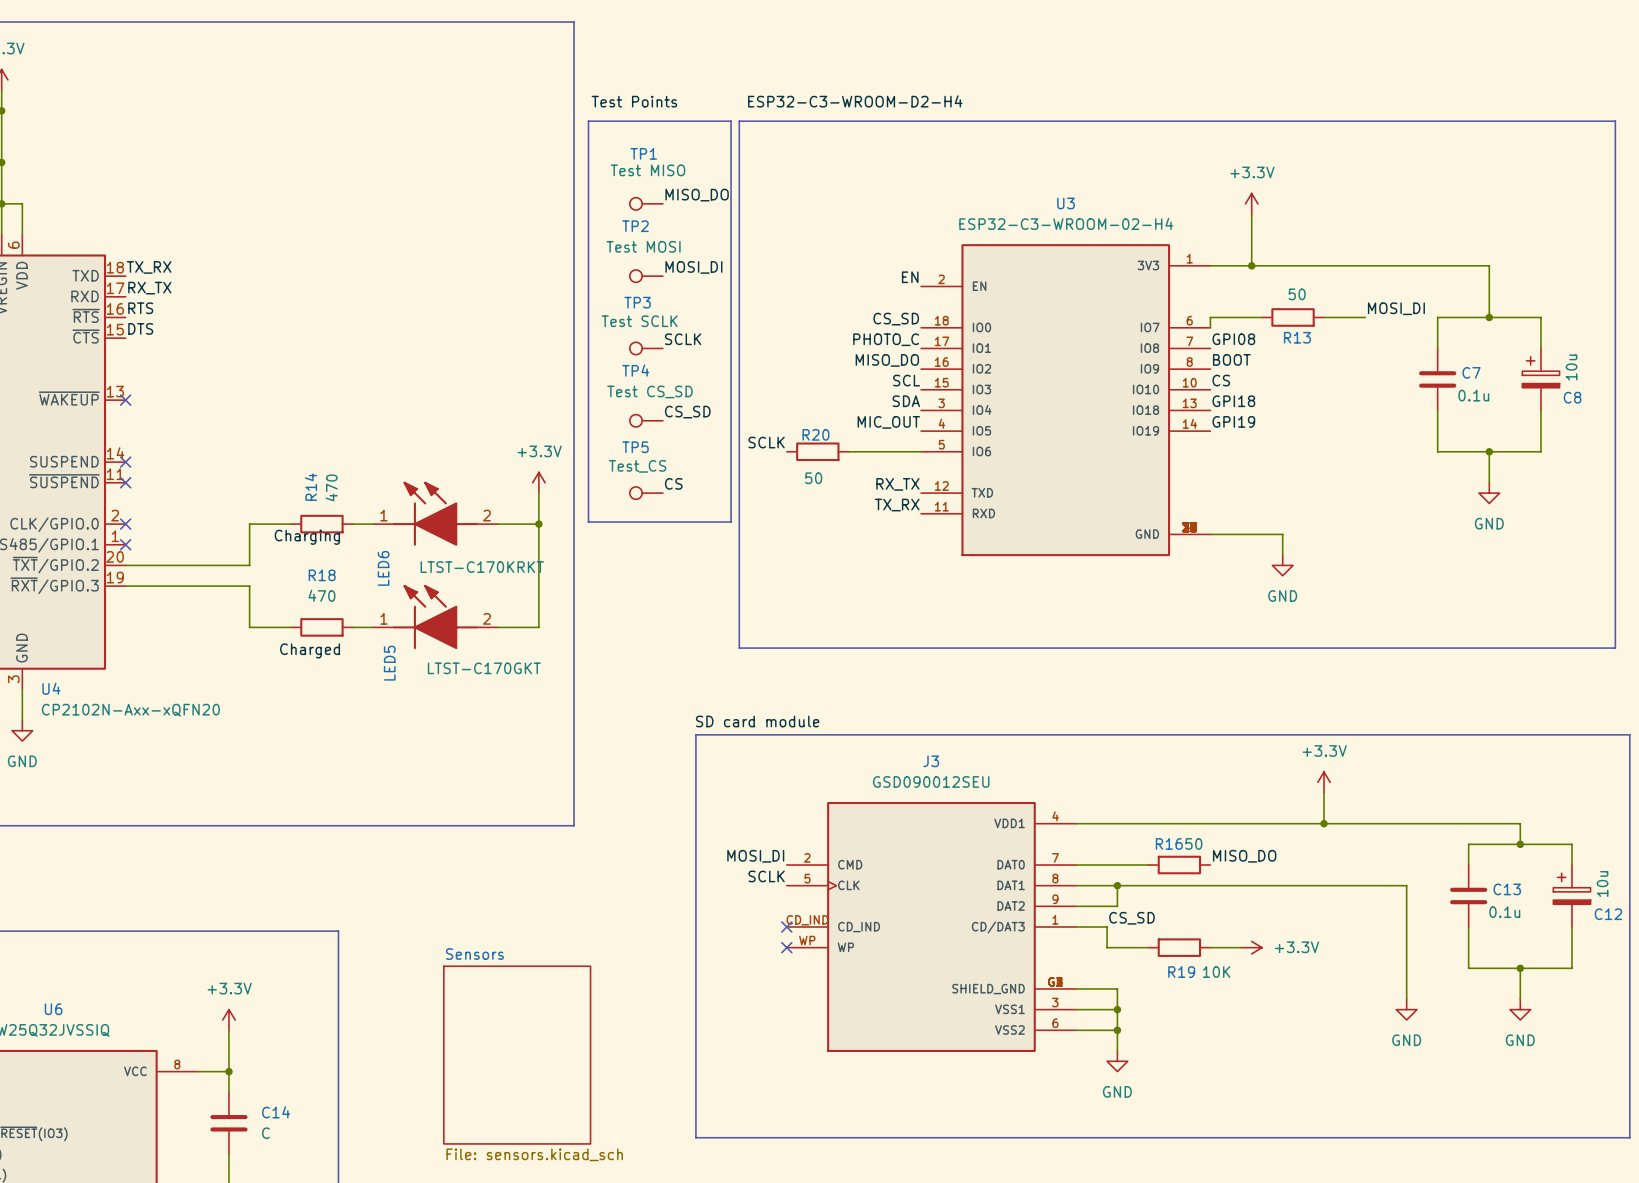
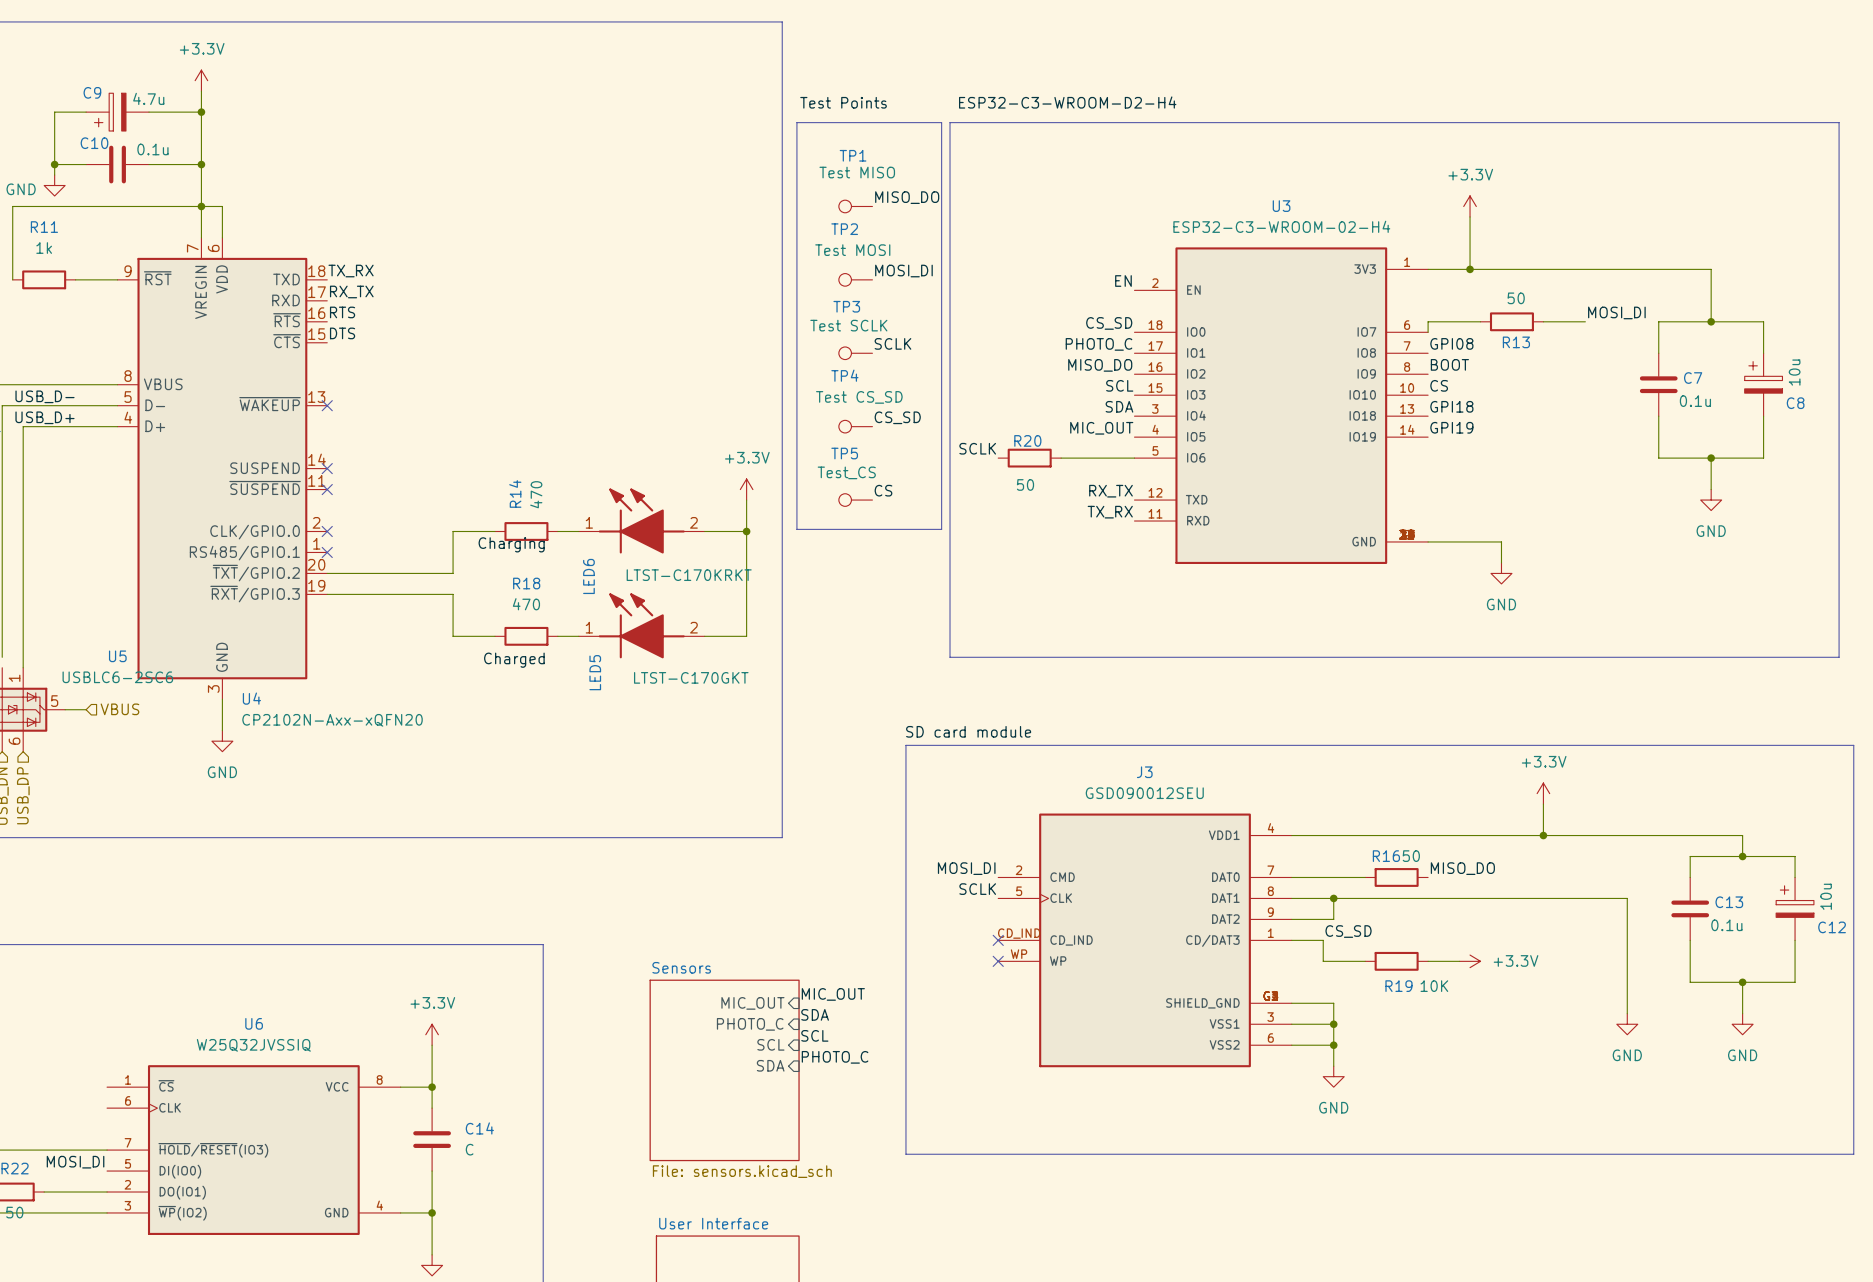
label: none -> MIC_OUT (833, 994)
sheet pin: none -> MIC_OUT (752, 1003)
label: none -> SDA (815, 1014)
sheet pin: none -> PHOTO_C (750, 1024)
label: none -> SCL (814, 1035)
sheet pin: none -> SCL (770, 1044)
label: none -> PHOTO_C (835, 1057)
sheet pin: none -> SDA (770, 1065)

